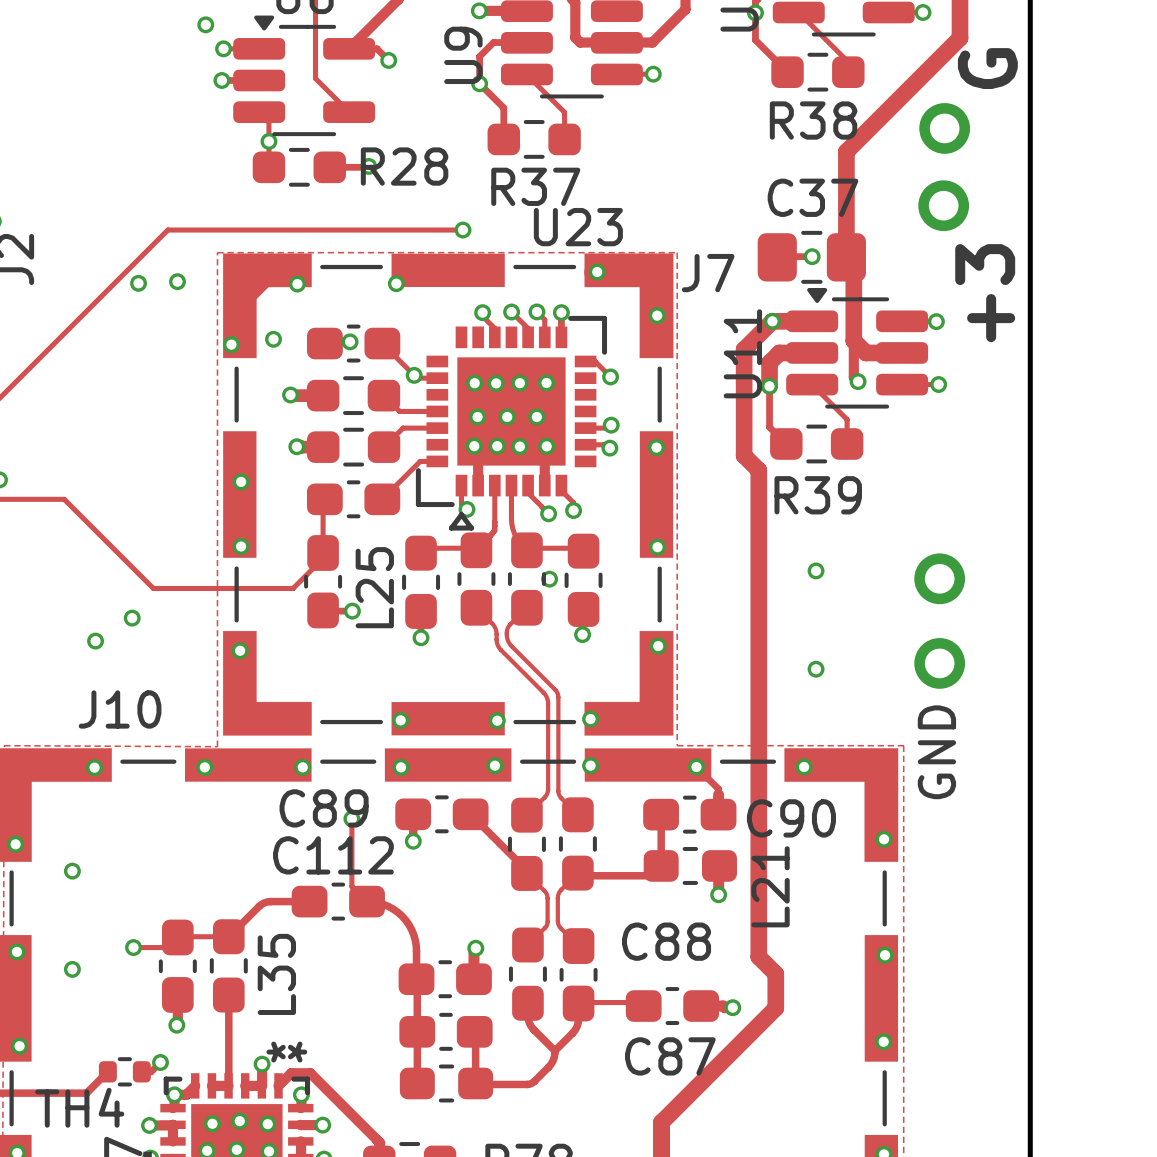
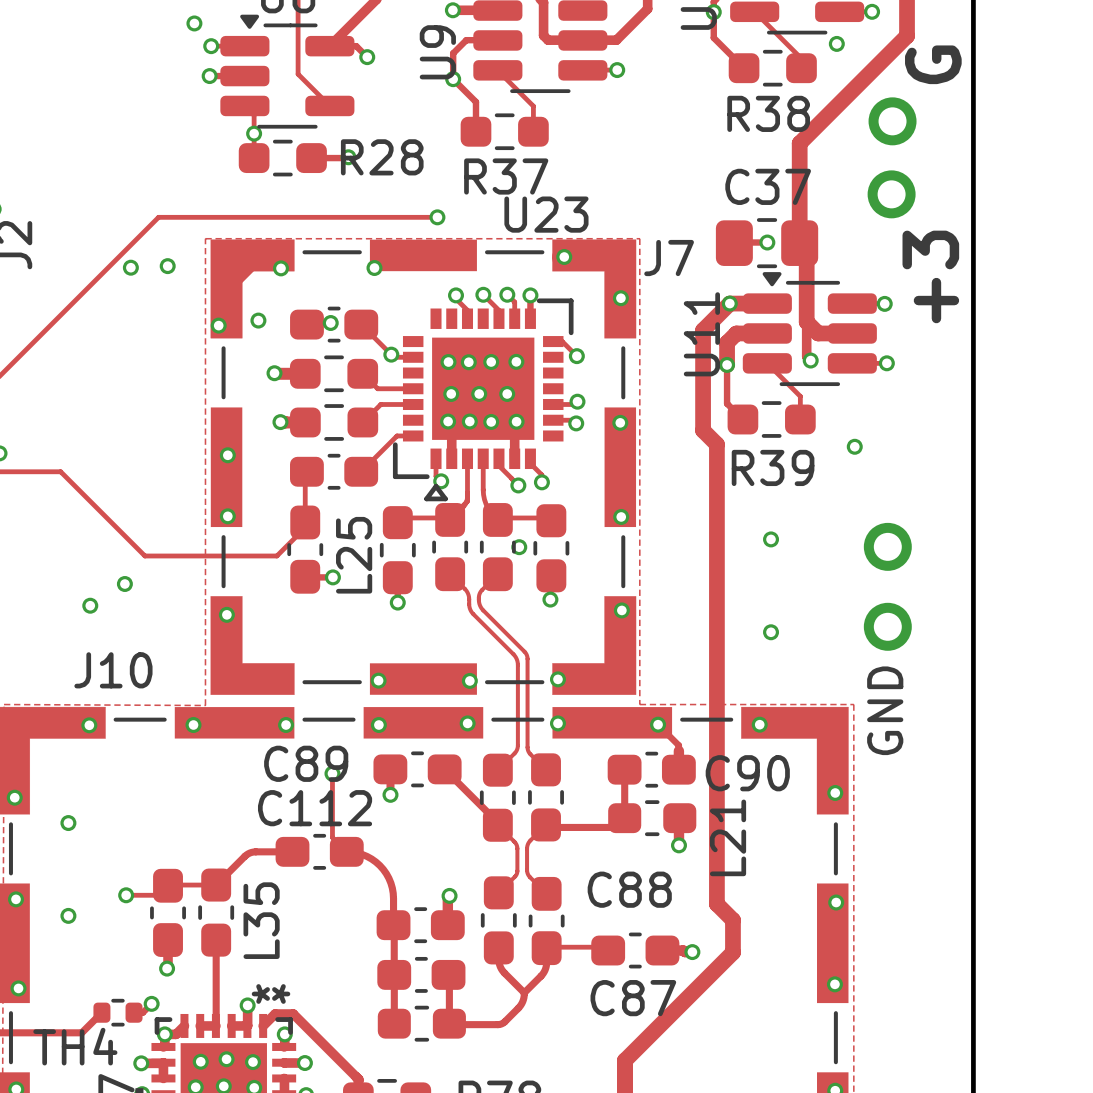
via: none -> (836, 43)
via: none -> (854, 446)

